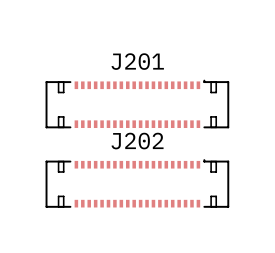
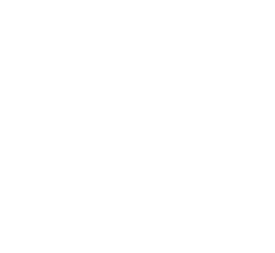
J201: (137, 104) -> none
J202: (137, 183) -> none

